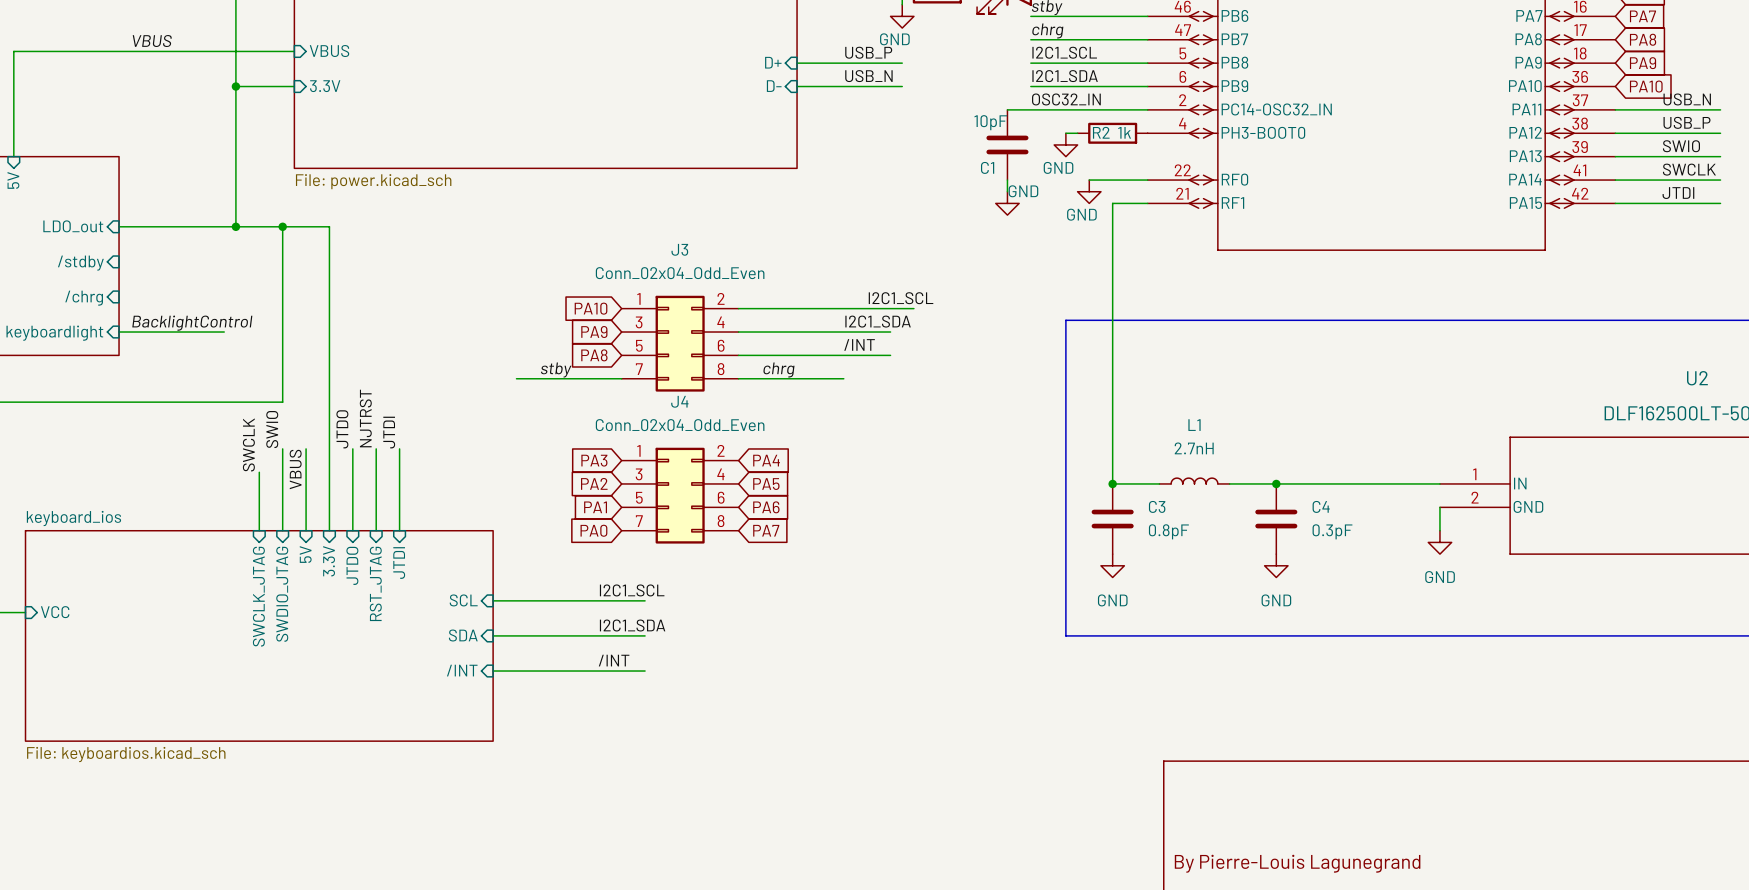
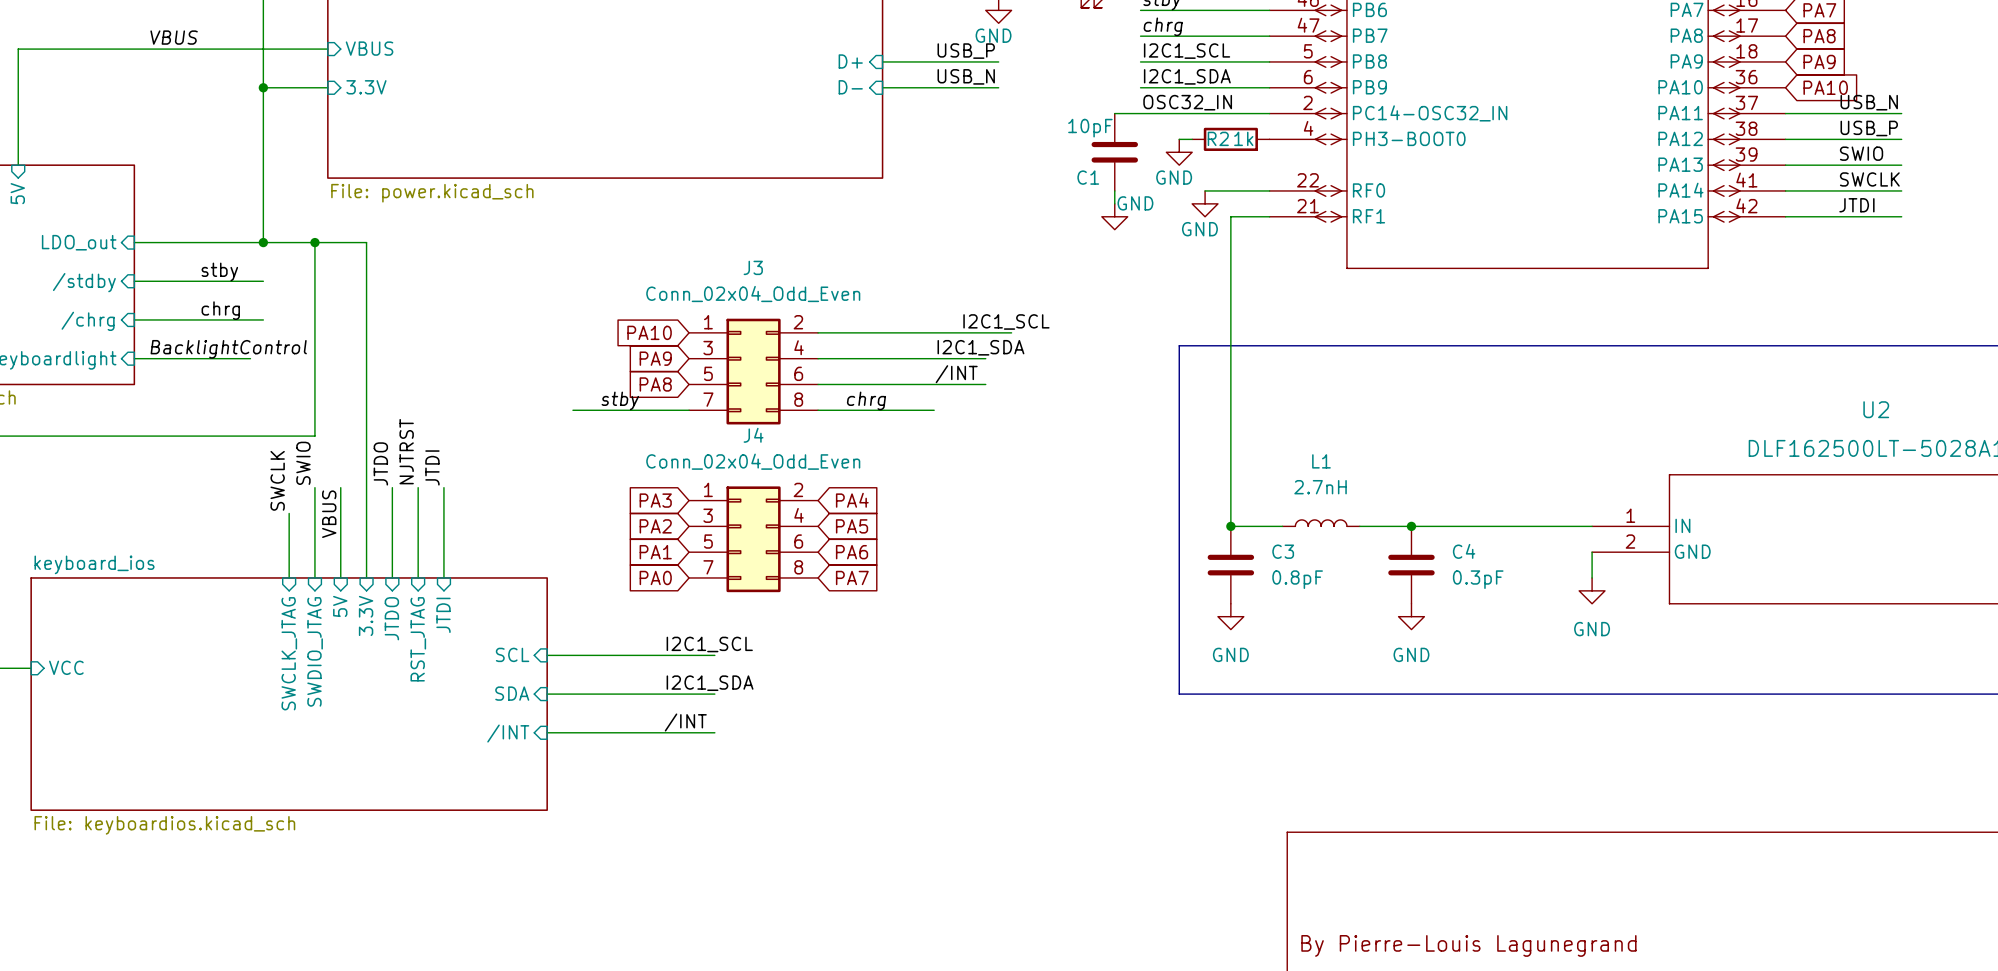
label: none -> stby (219, 271)
wire: none -> (134, 281) (263, 281)
label: none -> chrg (220, 310)
wire: none -> (134, 319) (263, 319)

